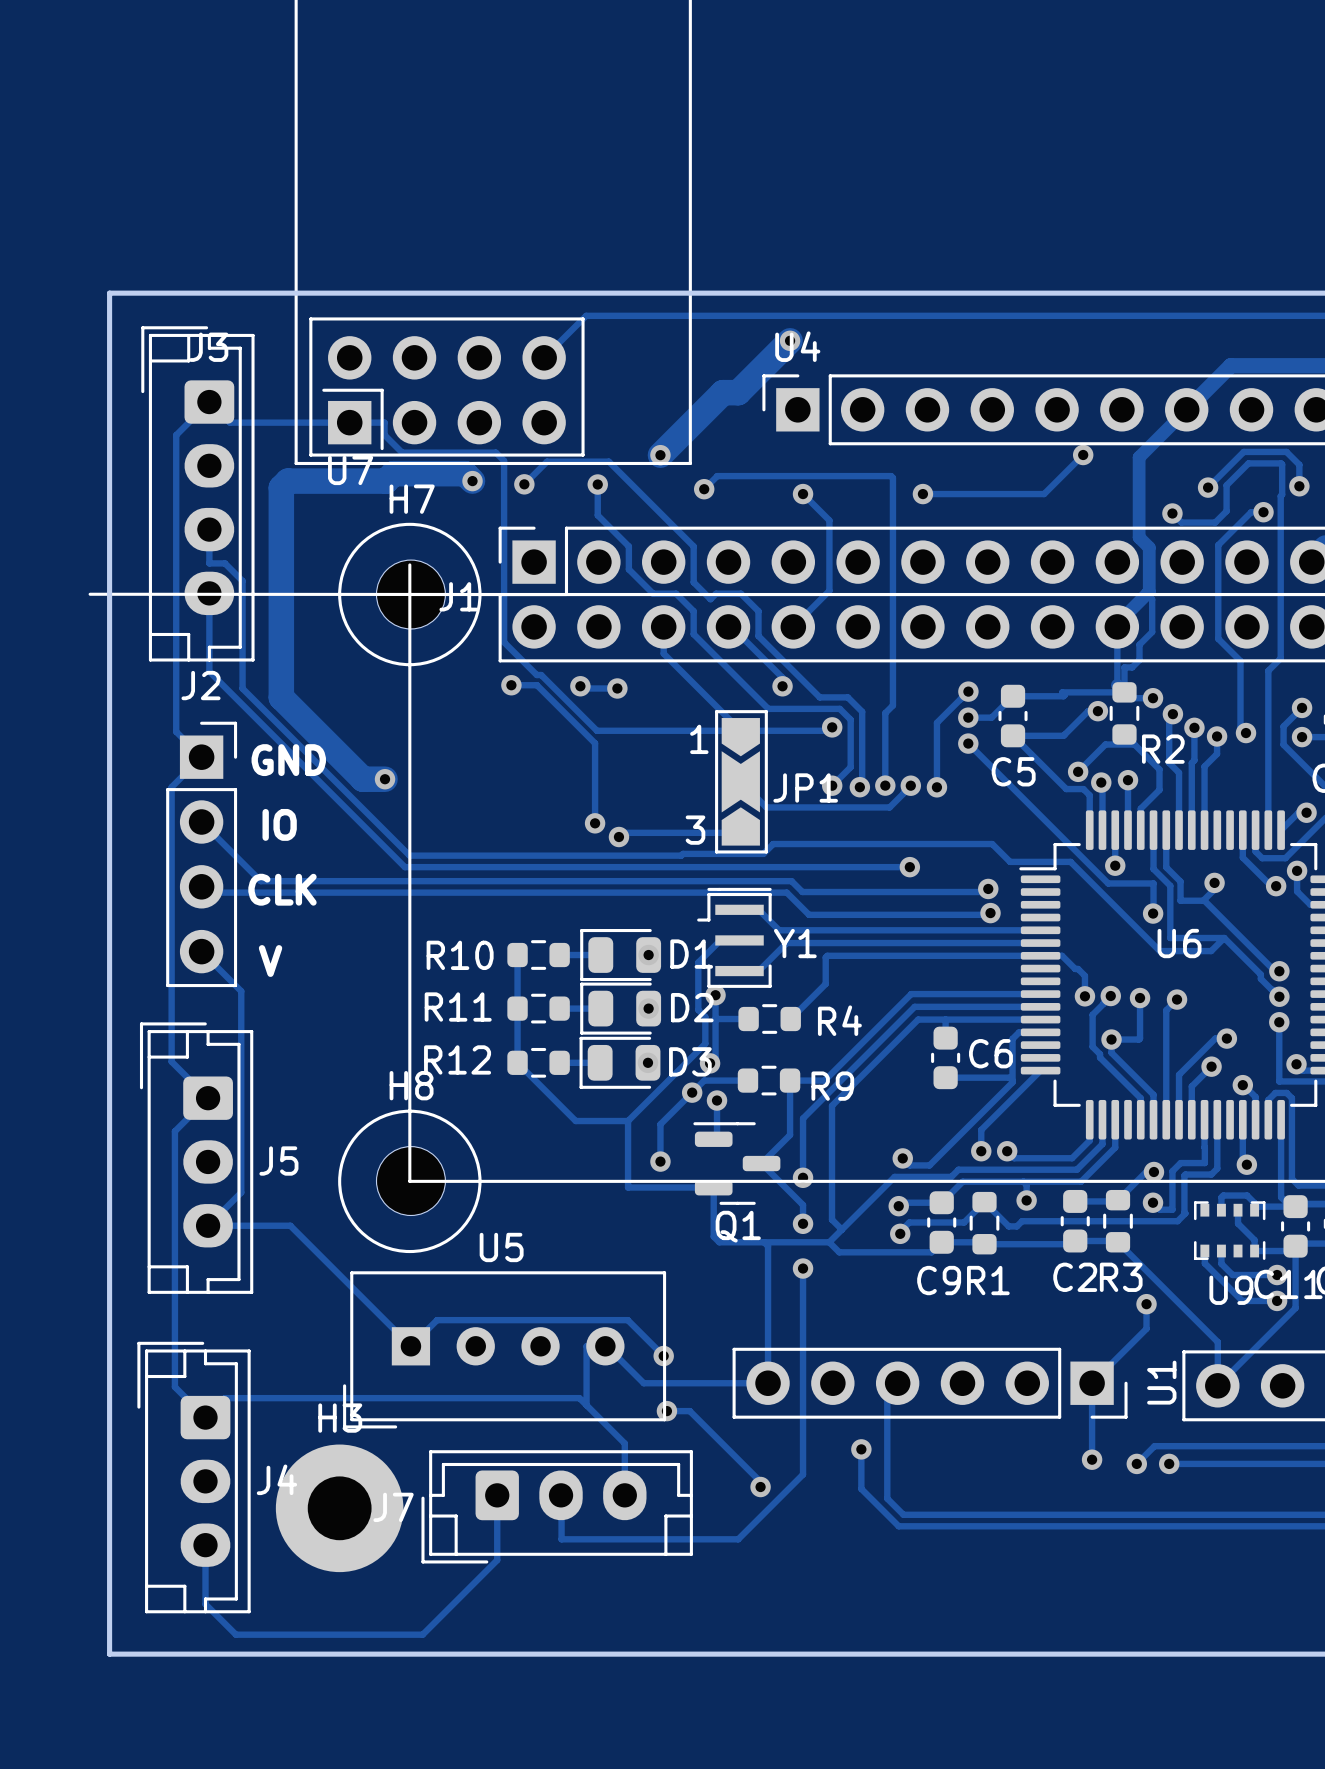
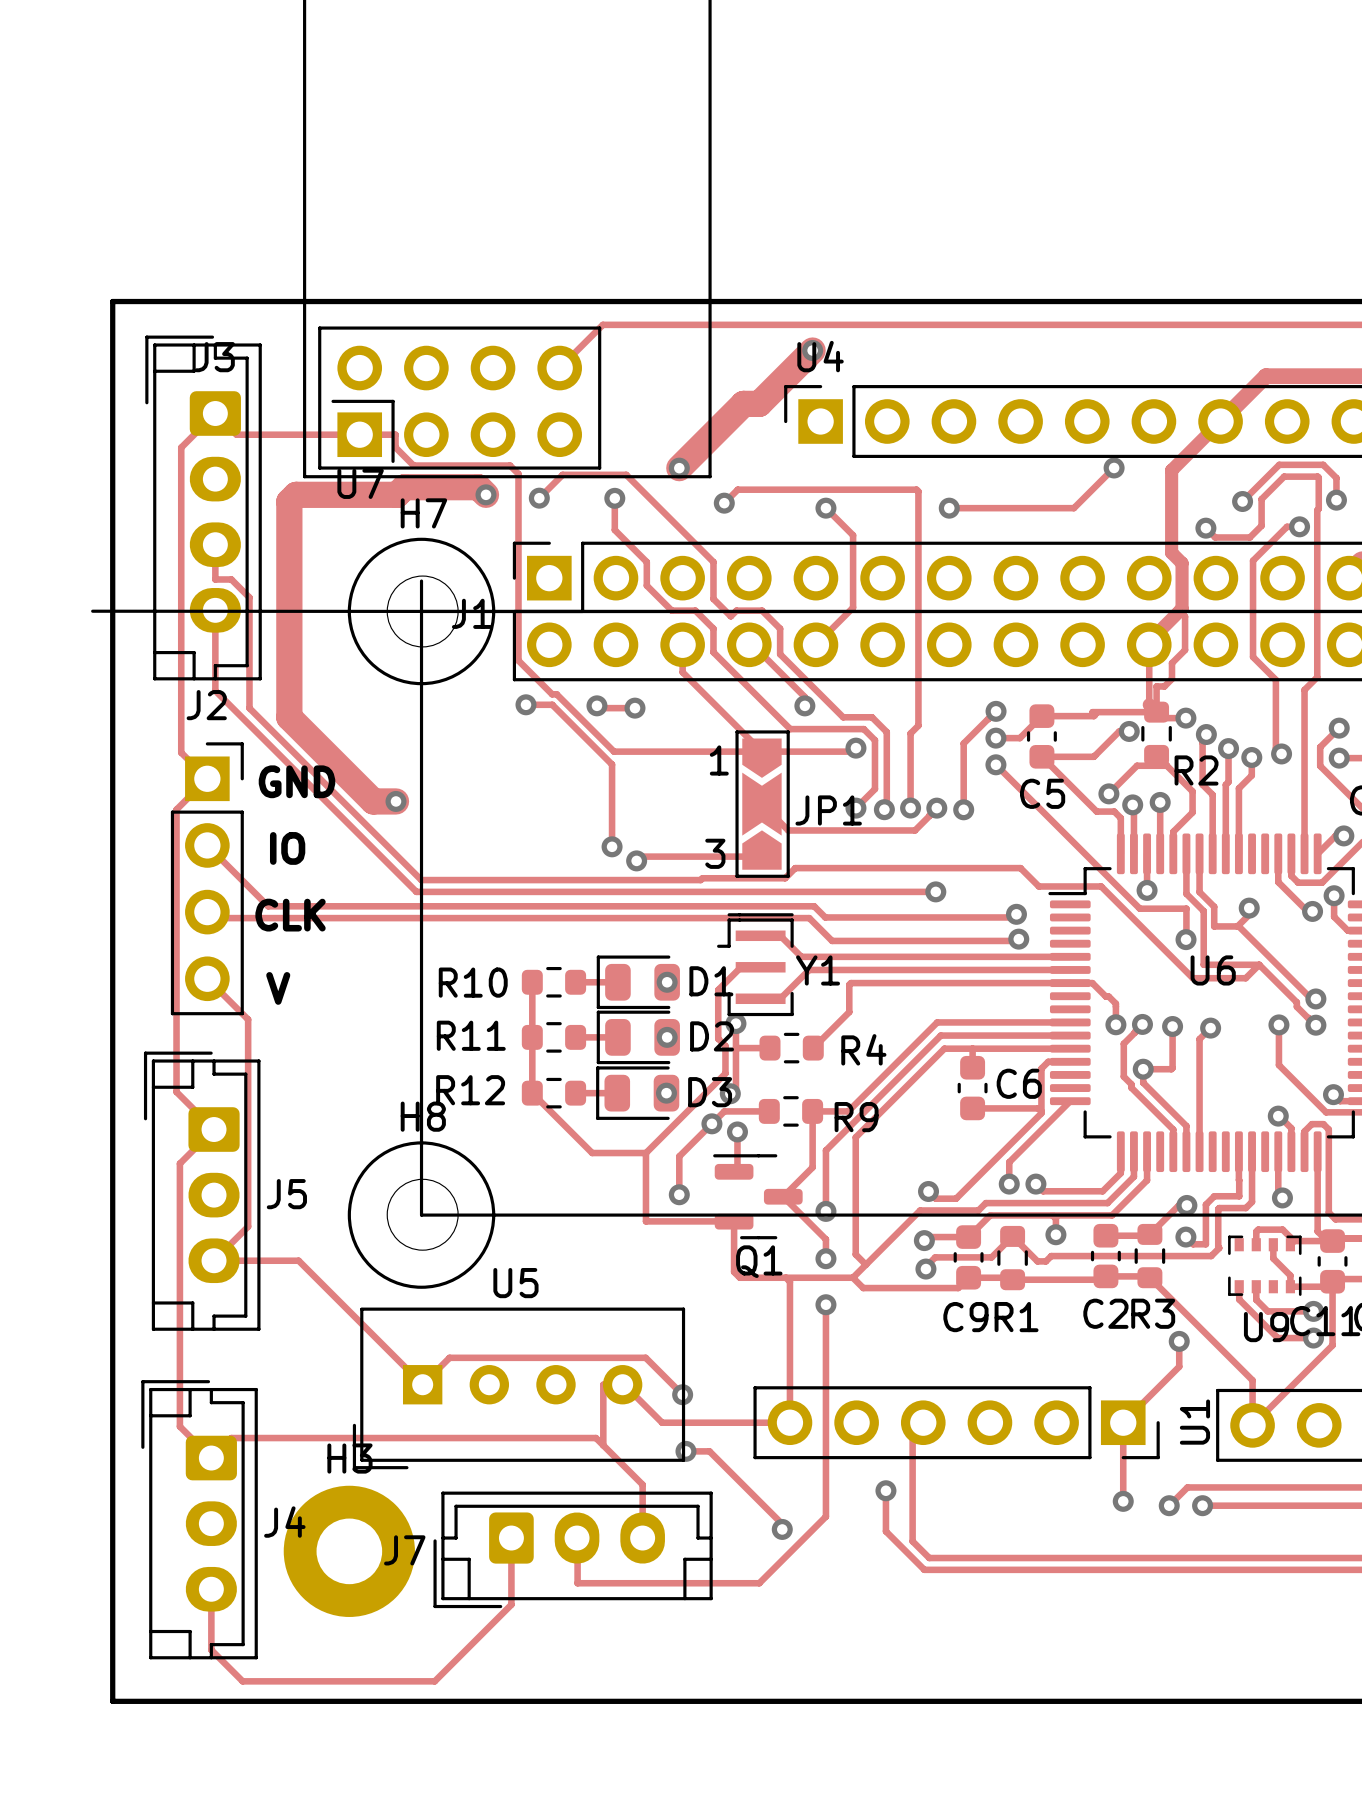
via: none -> (1278, 1024)
track: (1279, 1022) (1279, 1081) (1289, 1081) -> (1278, 1024) (1278, 1065) (1326, 1112)
via: (1279, 1022) -> none
track: (1226, 1038) (1215, 1038) (1179, 1074) (1179, 1119) -> none
via: (1226, 1038) -> none
track: (1211, 1066) (1191, 1086) (1191, 1119) -> none
via: (1211, 1066) -> none

